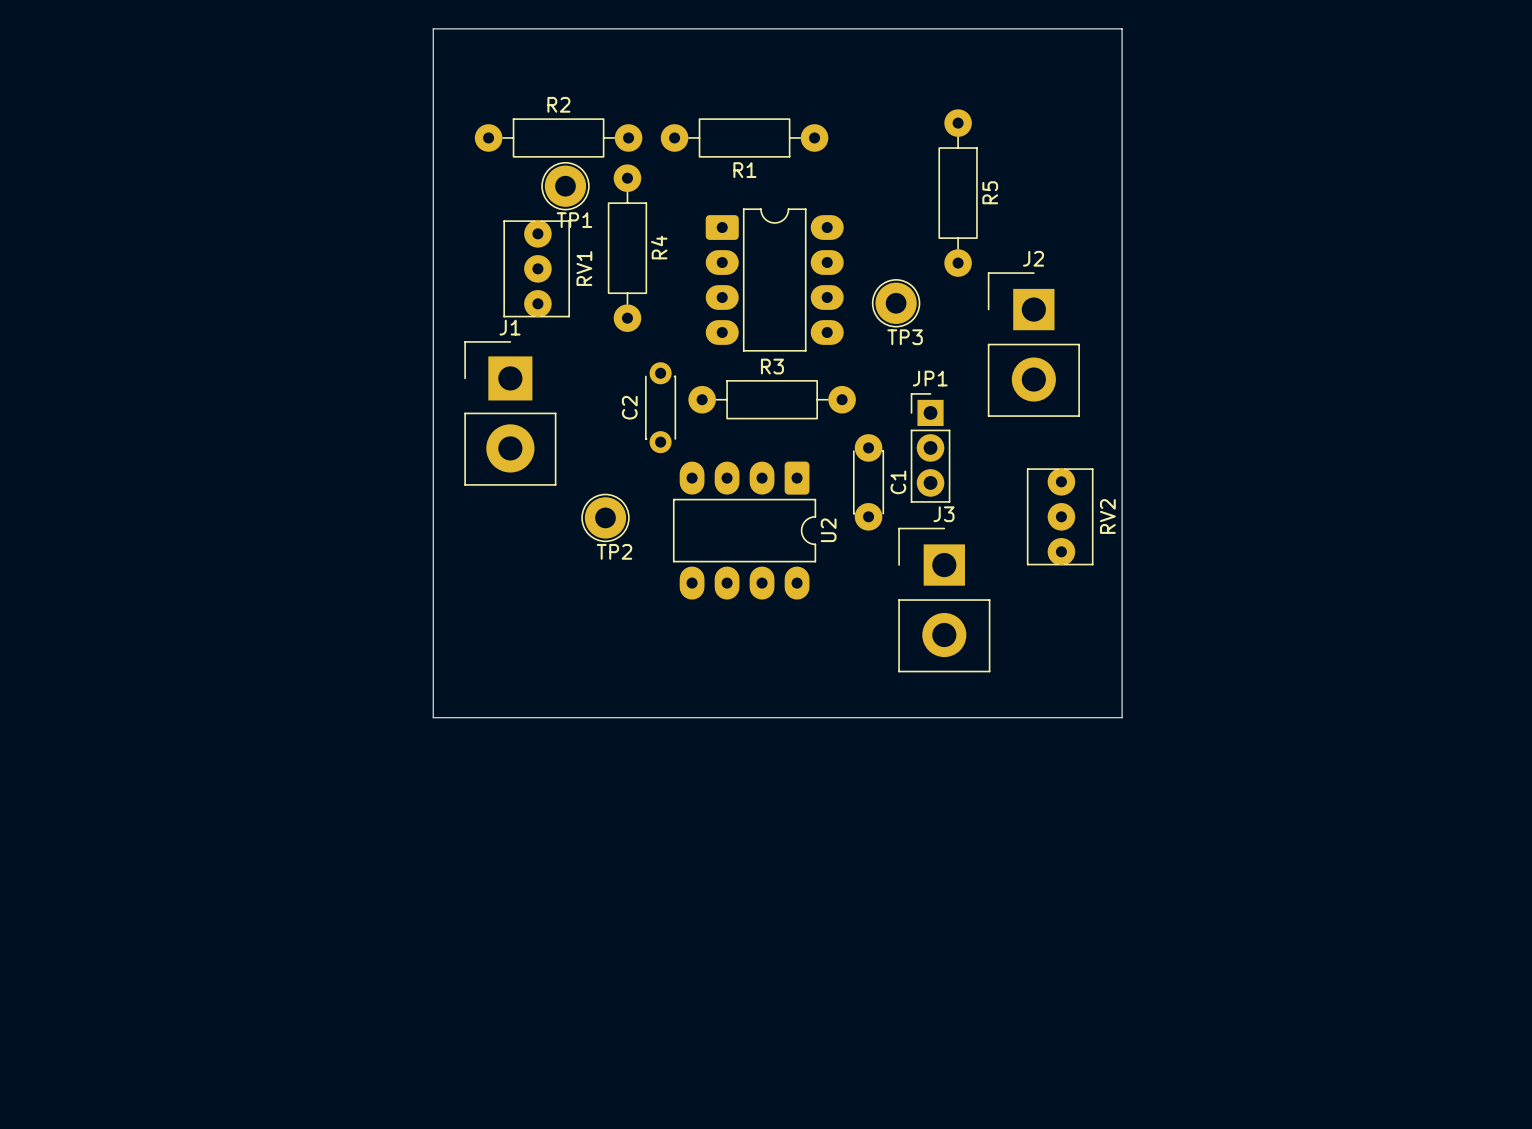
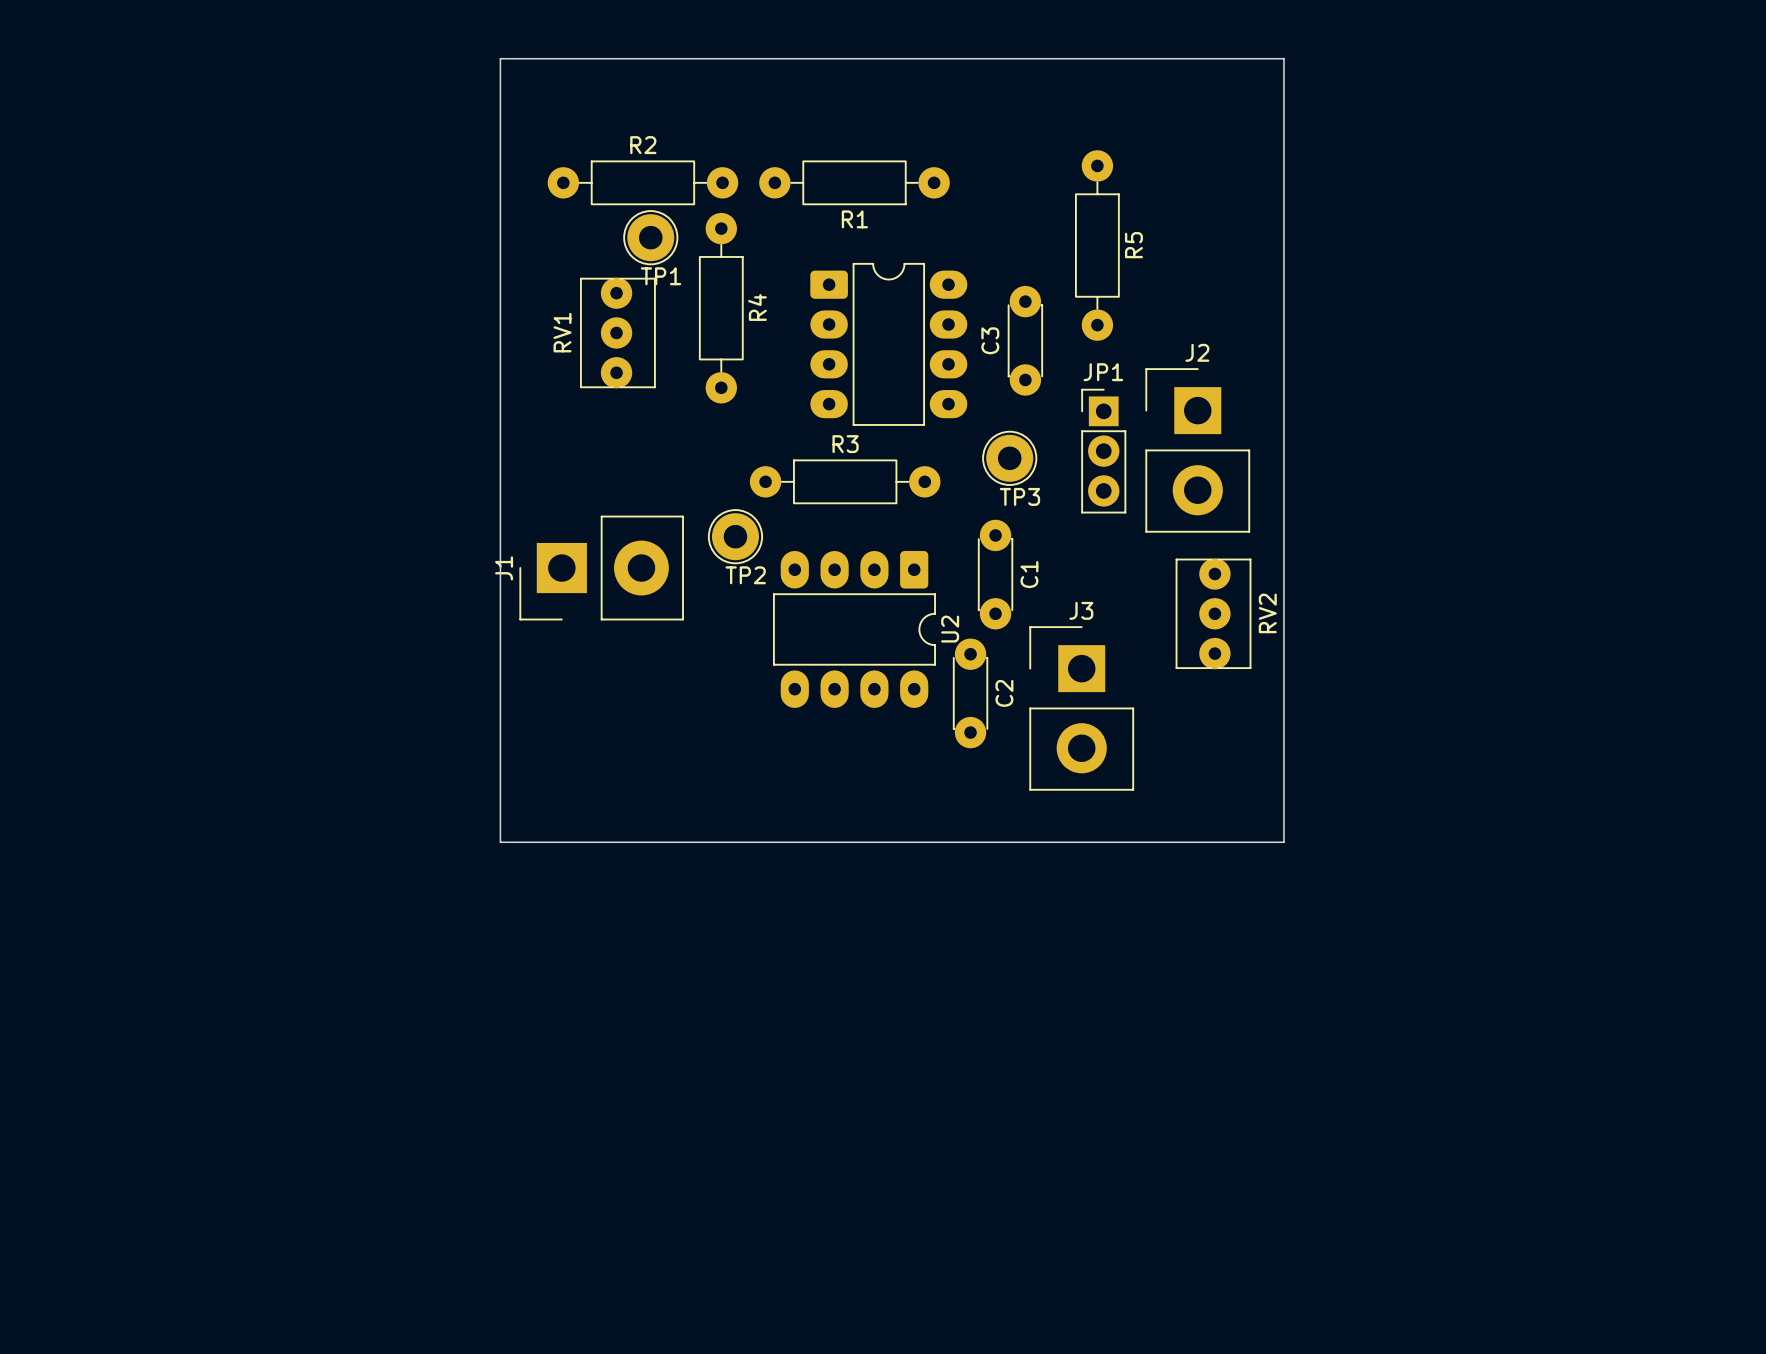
RV1 rotation: 0° (536, 268) -> 180° (617, 332)
C3: none -> (1025, 340)
TP3 position: (896, 303) -> (1009, 458)
J2 position: (1033, 344) -> (1197, 450)
C2 footprint: [645, 362, 677, 454] -> [952, 638, 989, 749]
R3 position: (772, 399) -> (845, 481)
C2 name position: C2 (629, 407) -> C2 (1004, 693)
J1 rotation: 0° (510, 413) -> 90° counterclockwise (601, 568)
JP1 position: (930, 447) -> (1103, 451)
TP2 position: (605, 517) -> (735, 536)

